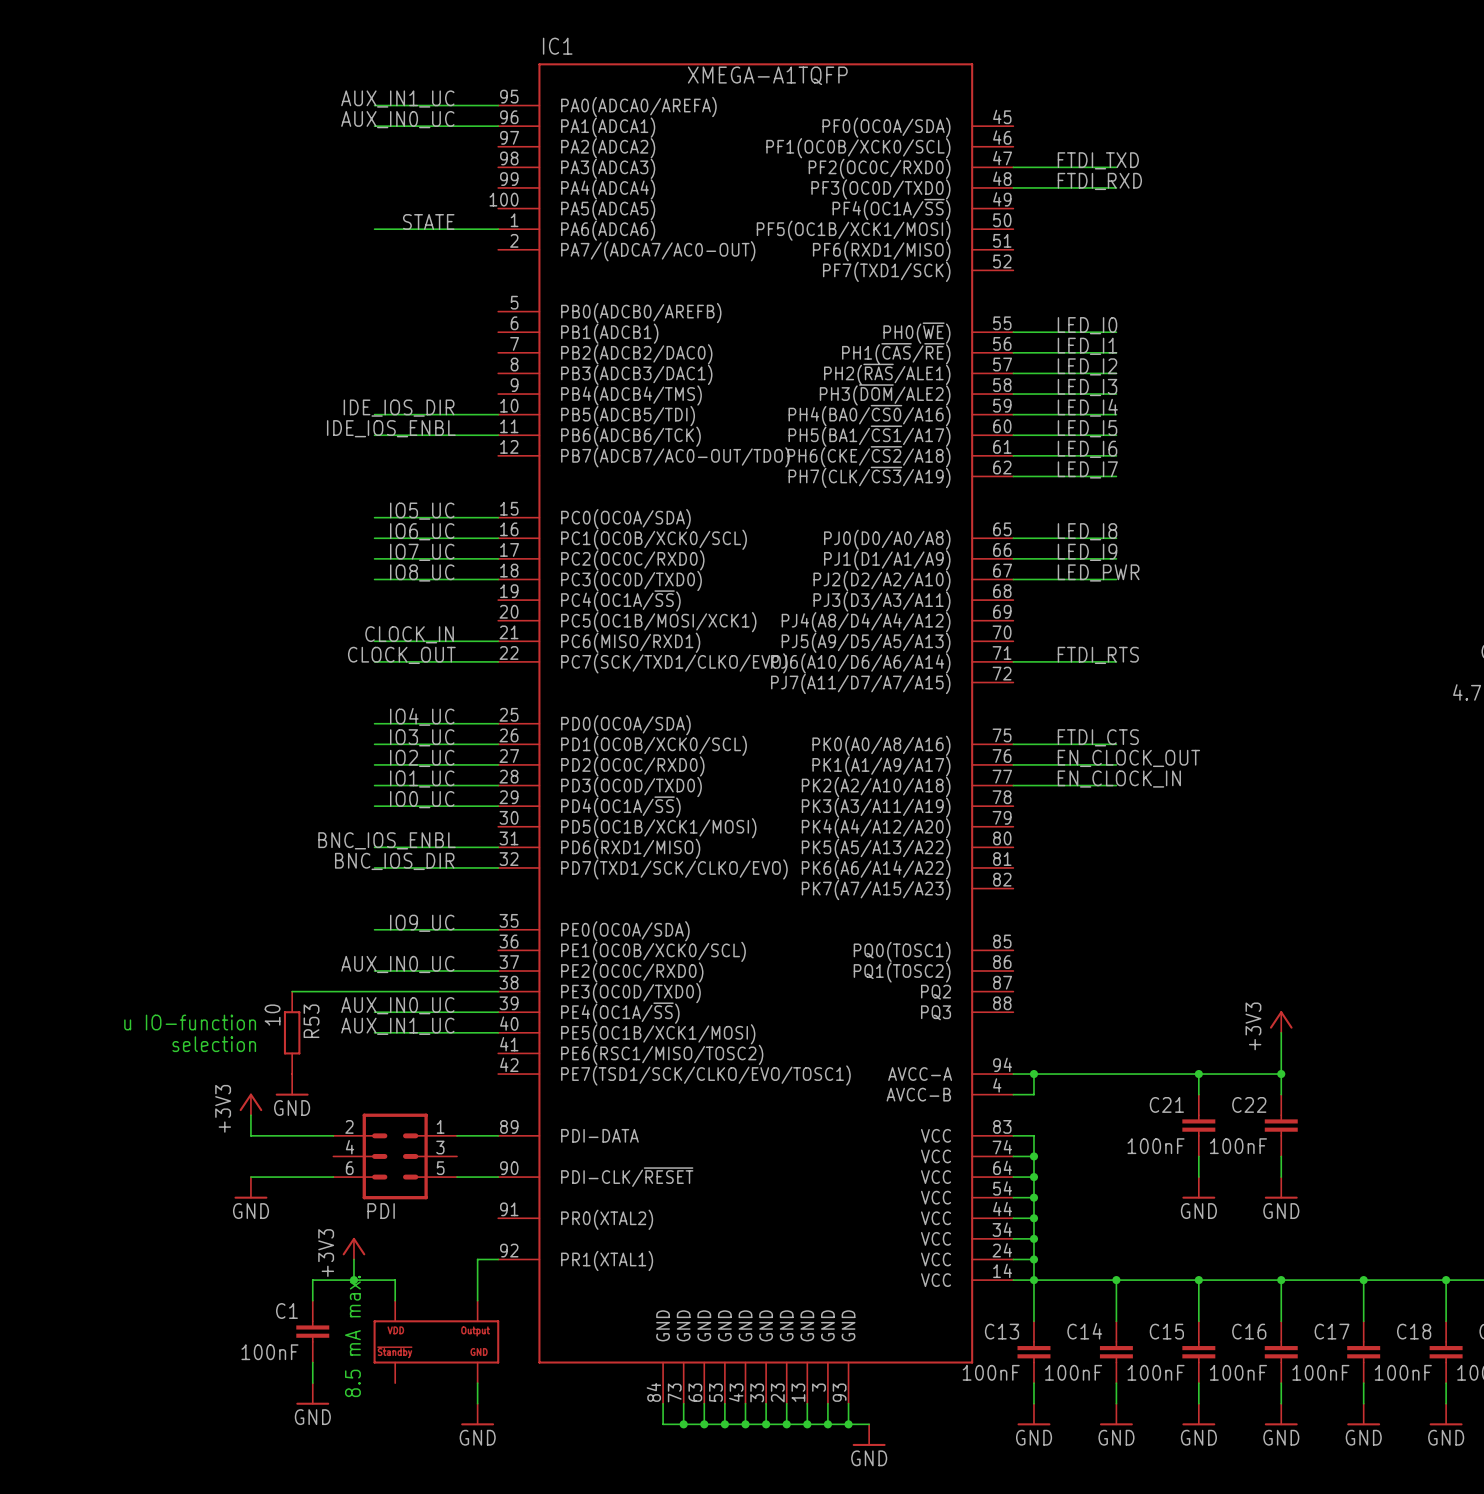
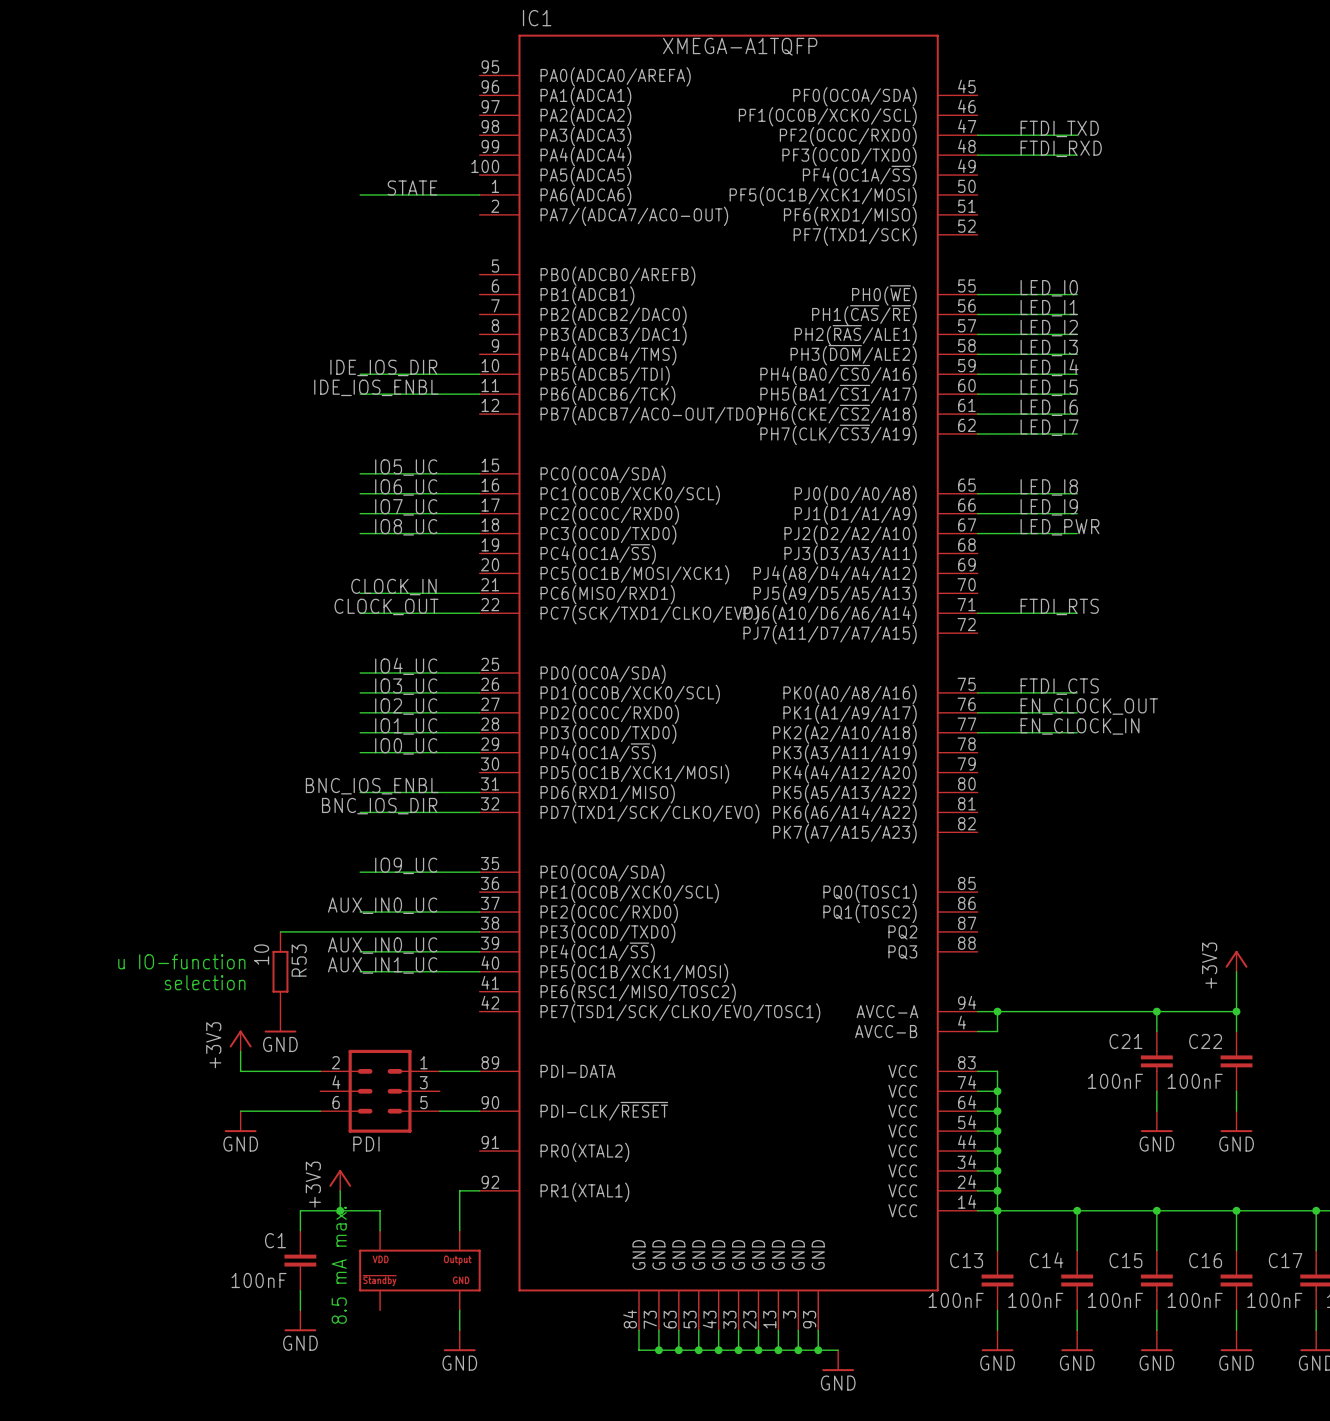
label: AUX_IN1_UC (397, 99) -> none
wire: (374, 105) (498, 105) -> none
label: AUX_IN0_UC (397, 119) -> none
wire: (374, 126) (498, 126) -> none

